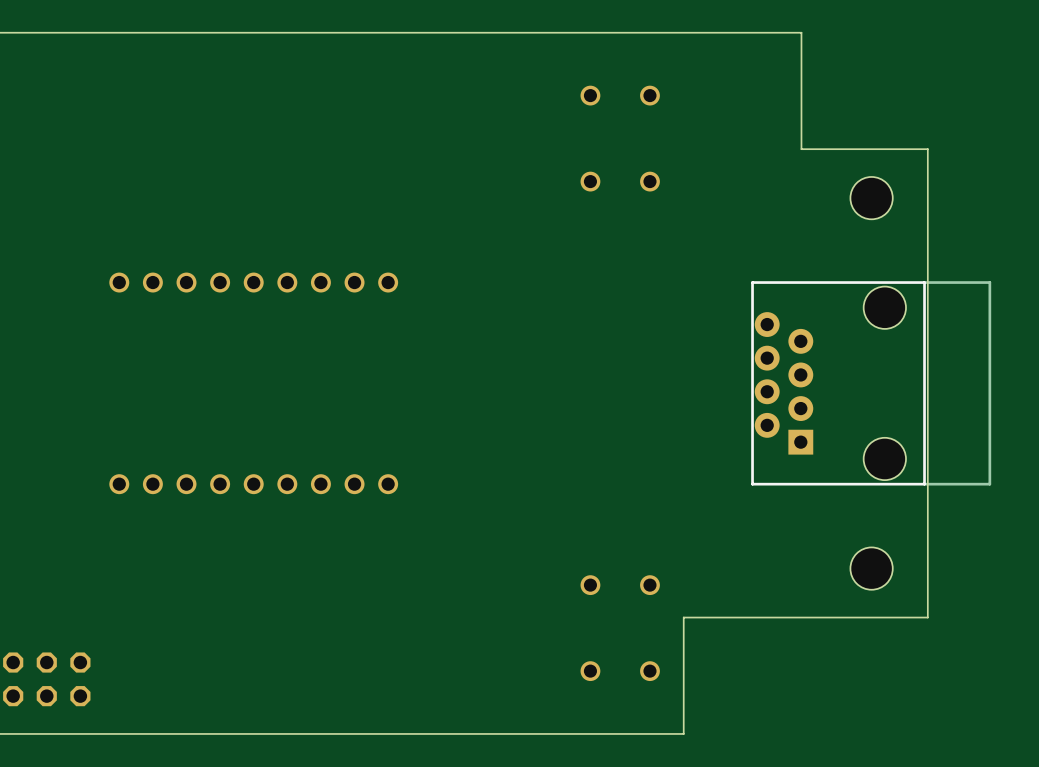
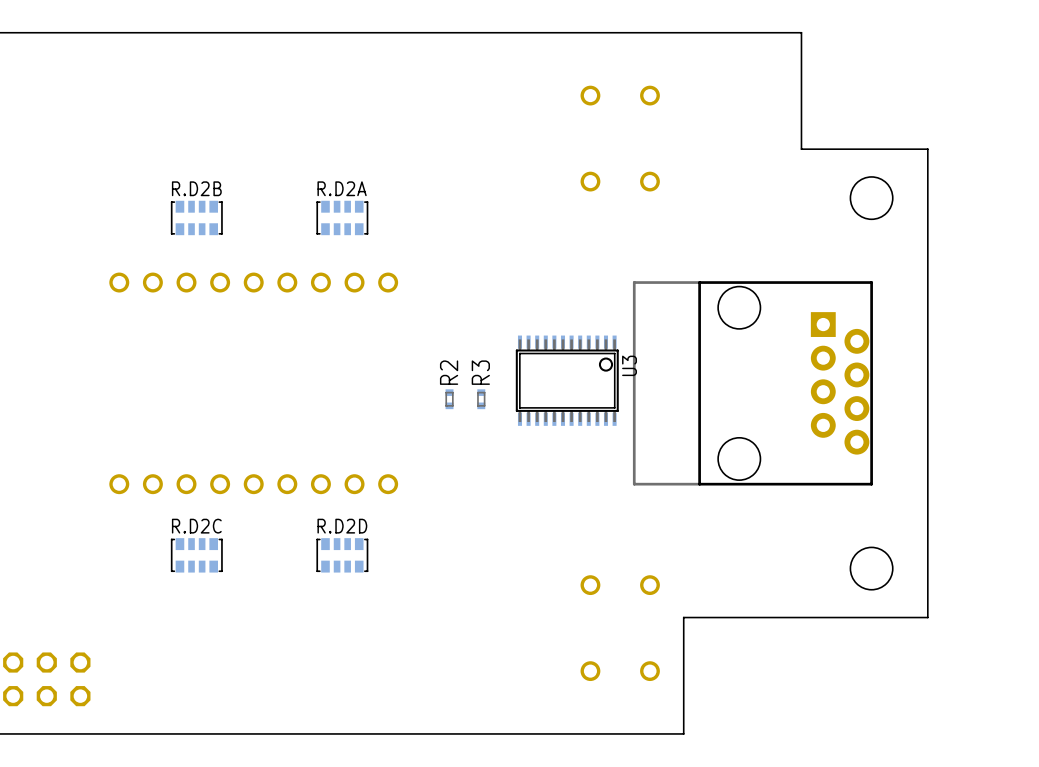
R.D2B: none -> (196, 217)
R.D2A: none -> (342, 217)
U3: none -> (567, 380)
part rotation: 0° (871, 383) -> 180° (752, 383)
R2: none -> (449, 399)
R3: none -> (481, 399)
R.D2C: none -> (196, 555)
R.D2D: none -> (342, 555)

